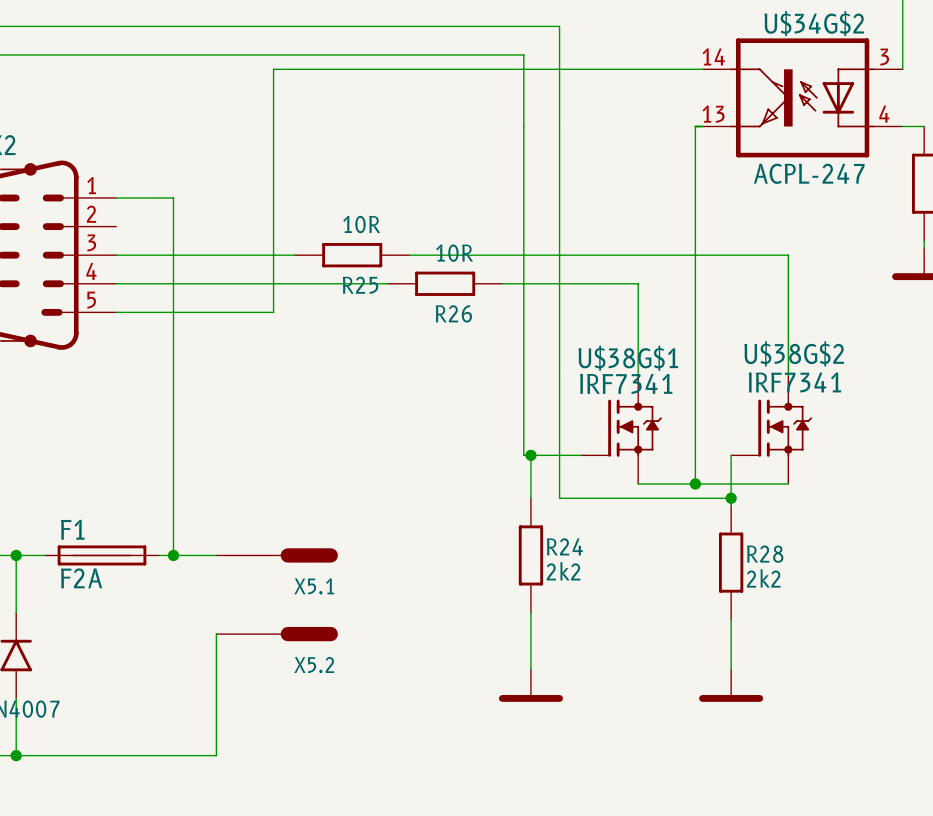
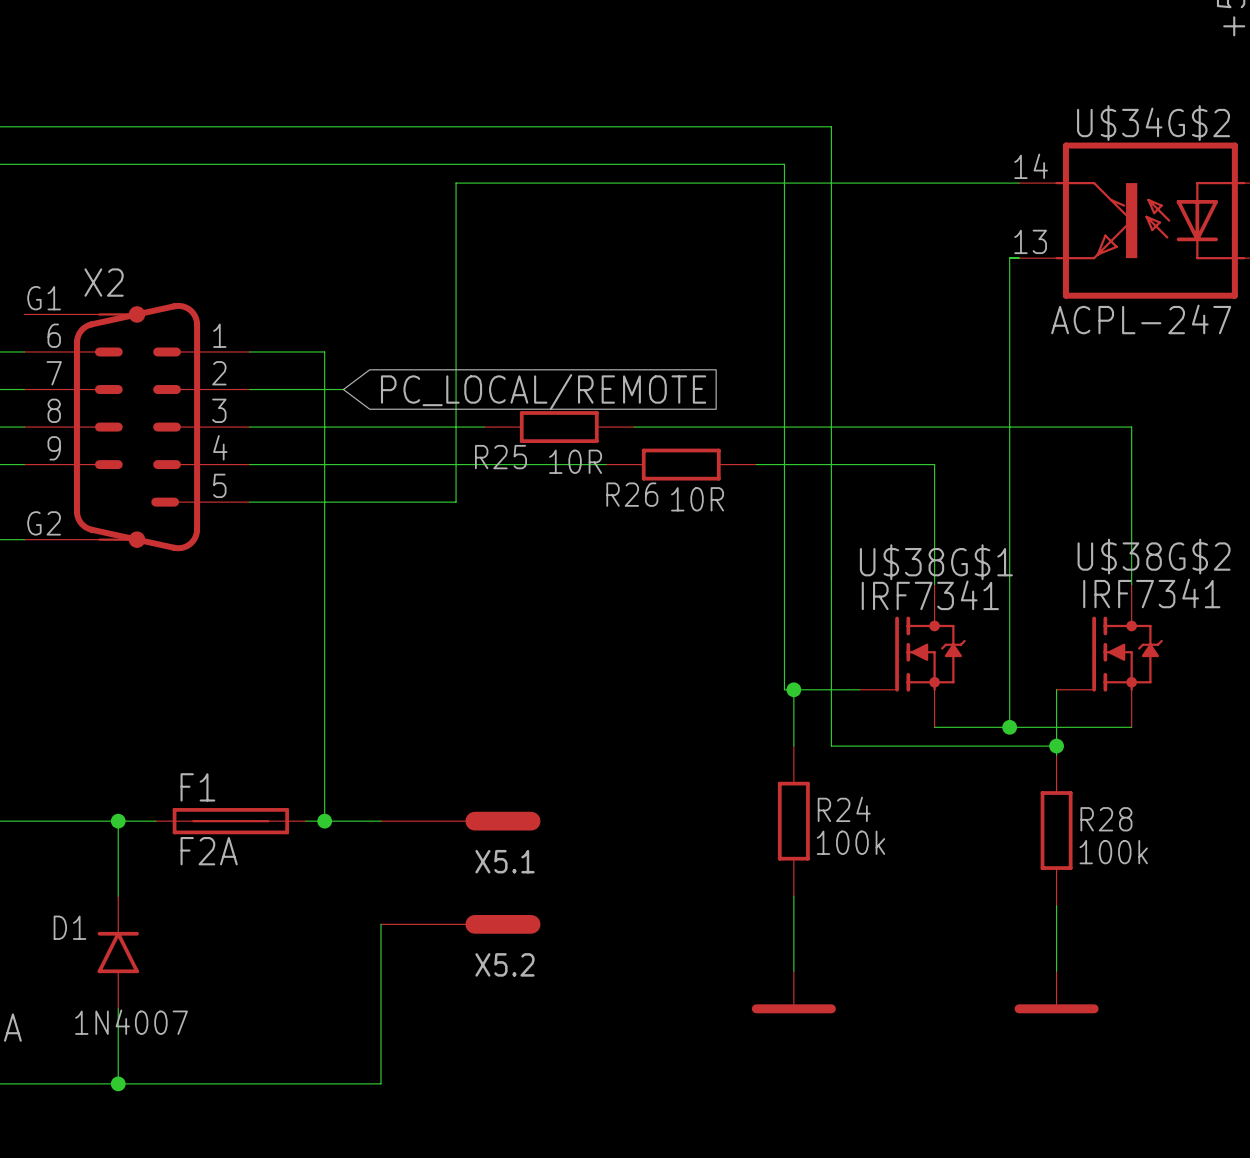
R25 value position: 10R (361, 224) -> 10R (575, 461)
wire: none -> (249, 389) (343, 389)
global label: none -> PC_LOCAL/REMOTE (543, 392)
R26 value position: 10R (454, 253) -> 10R (697, 499)
R25 name position: R25 (360, 285) -> R25 (500, 457)
R26 name position: R26 (453, 313) -> R26 (632, 494)
R24 value: 2k2 (563, 571) -> 100k (850, 842)
R28 value: 2k2 (763, 578) -> 100k (1113, 852)

